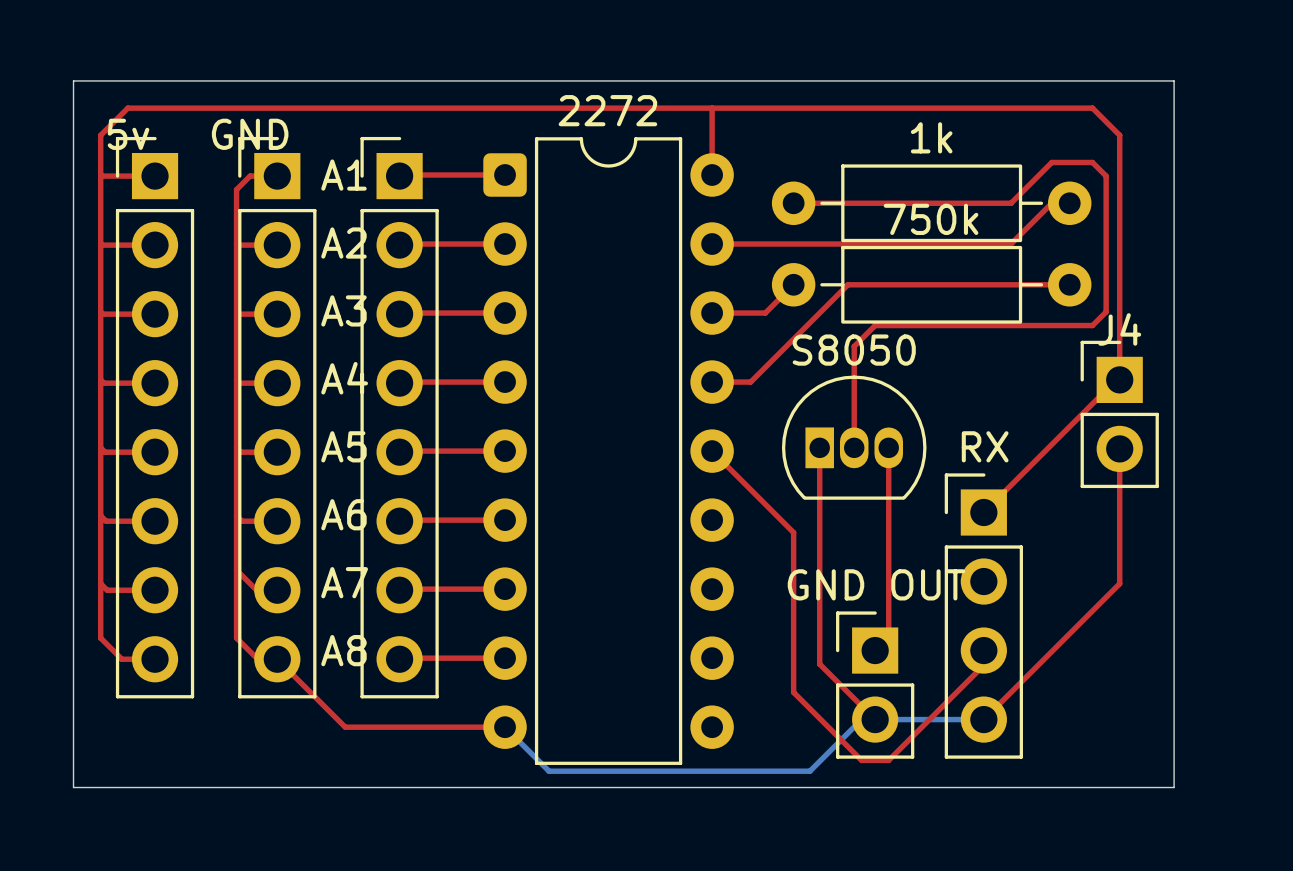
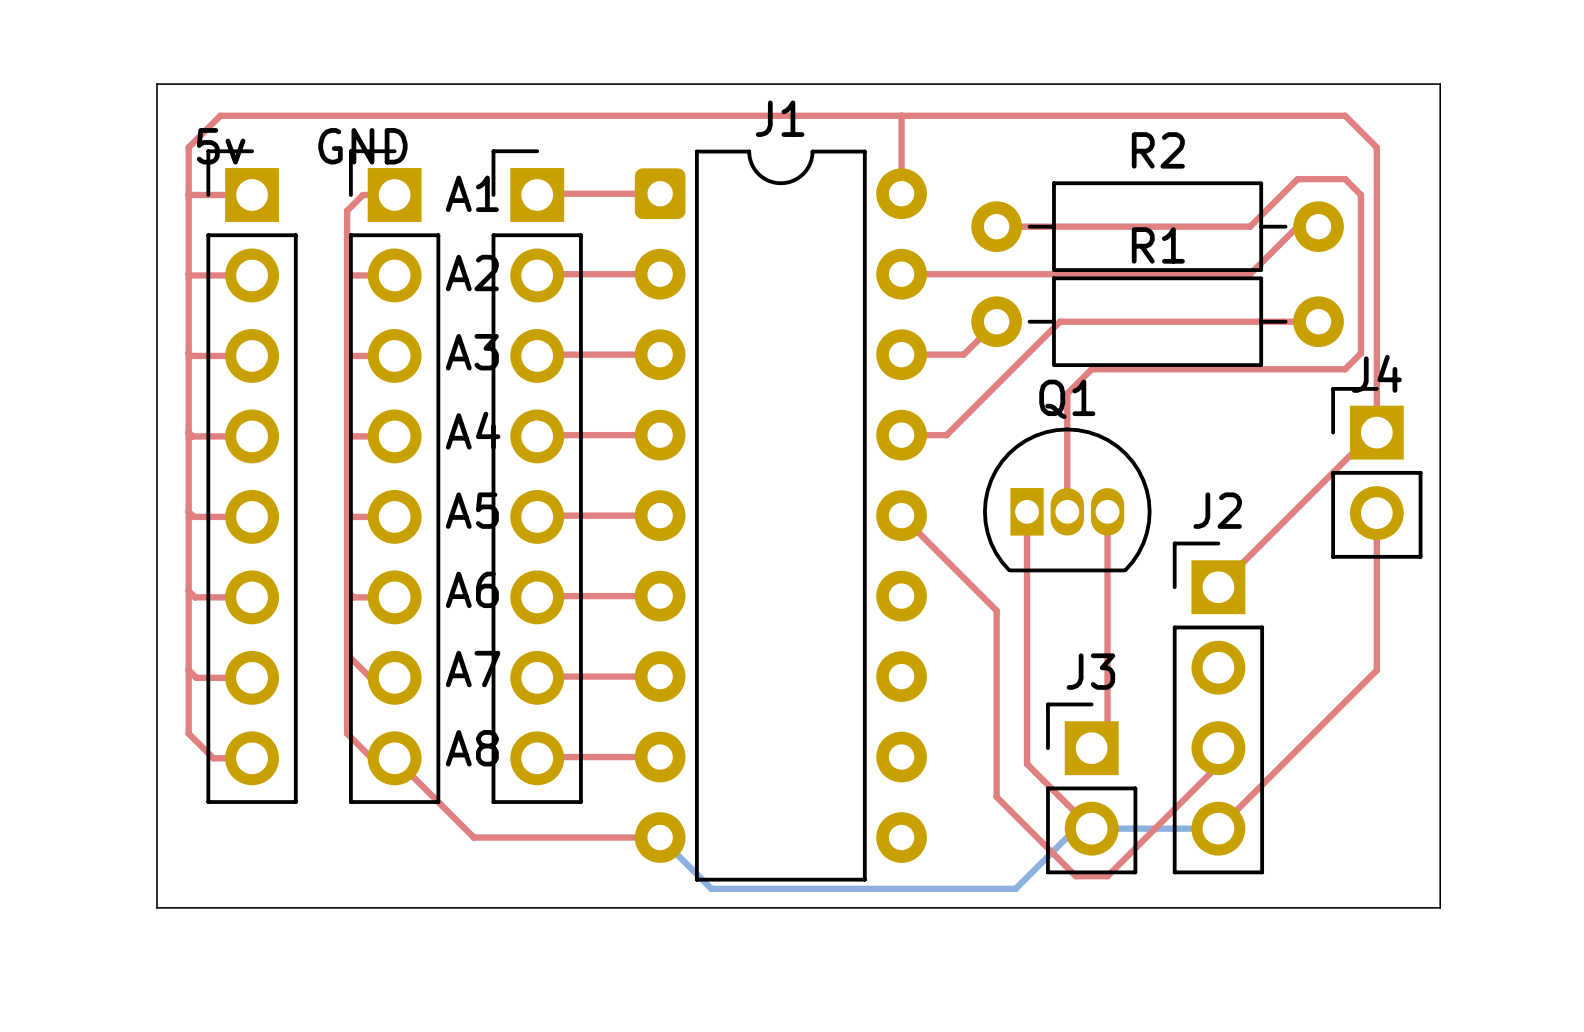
2272 name: 2272 (607, 110) -> J1 (780, 118)
1k name: 1k (931, 137) -> R2 (1158, 150)
750k name: 750k (931, 219) -> R1 (1158, 245)
S8050 name: S8050 (854, 350) -> Q1 (1067, 399)
RX name: RX (985, 446) -> J2 (1217, 510)
GND OUT name: GND OUT (876, 584) -> J3 (1090, 671)

